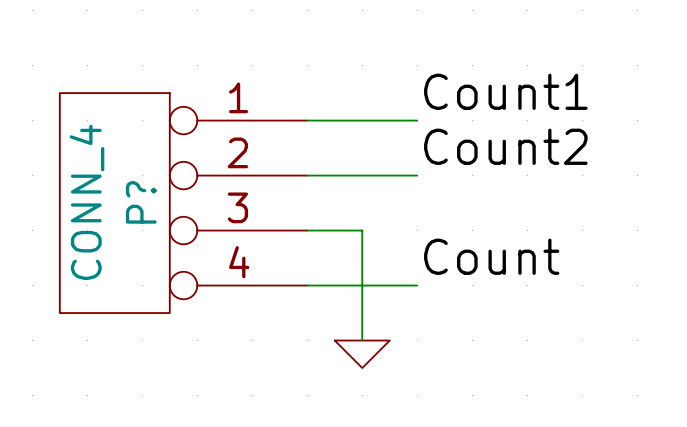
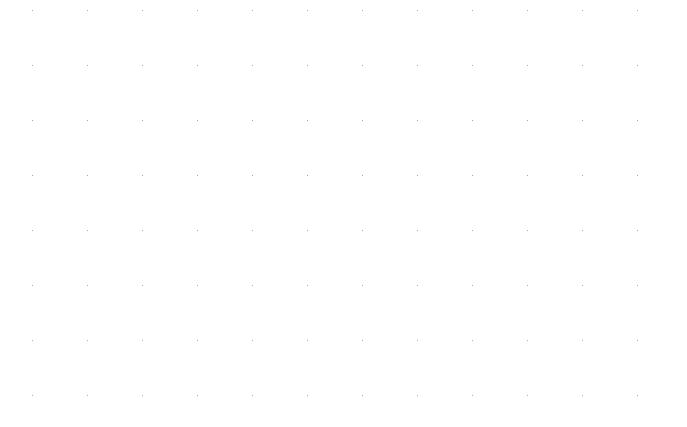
label: Count1 (505, 91) -> none
wire: (307, 120) (417, 120) -> none
label: Count2 (505, 146) -> none
wire: (307, 175) (417, 175) -> none
P?: CONN_4 (183, 203) -> none
wire: (307, 230) (362, 230) (362, 340) -> none
label: Count (491, 256) -> none
wire: (307, 285) (417, 285) -> none
power symbol: (362, 354) -> none

